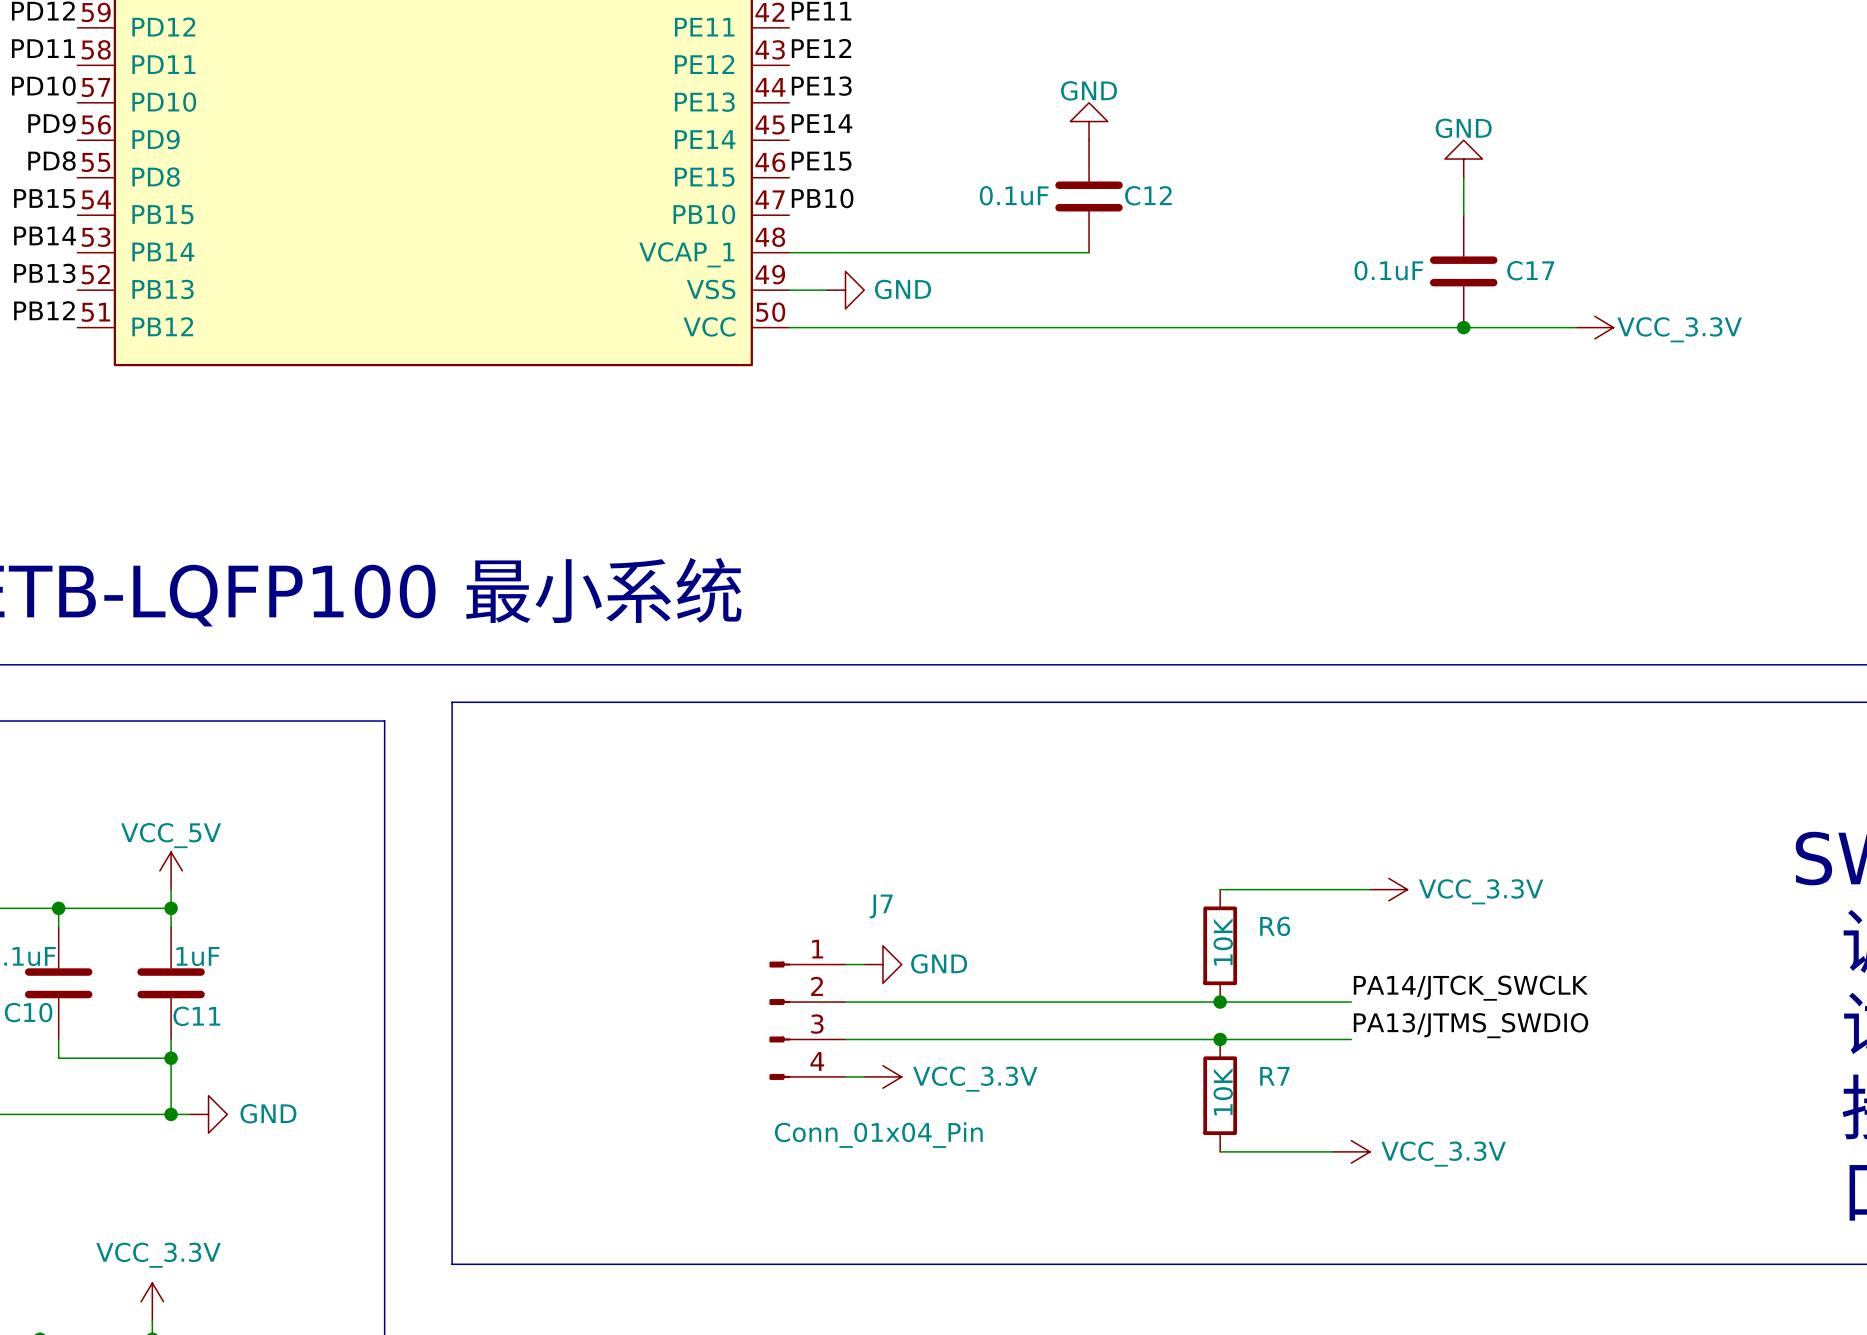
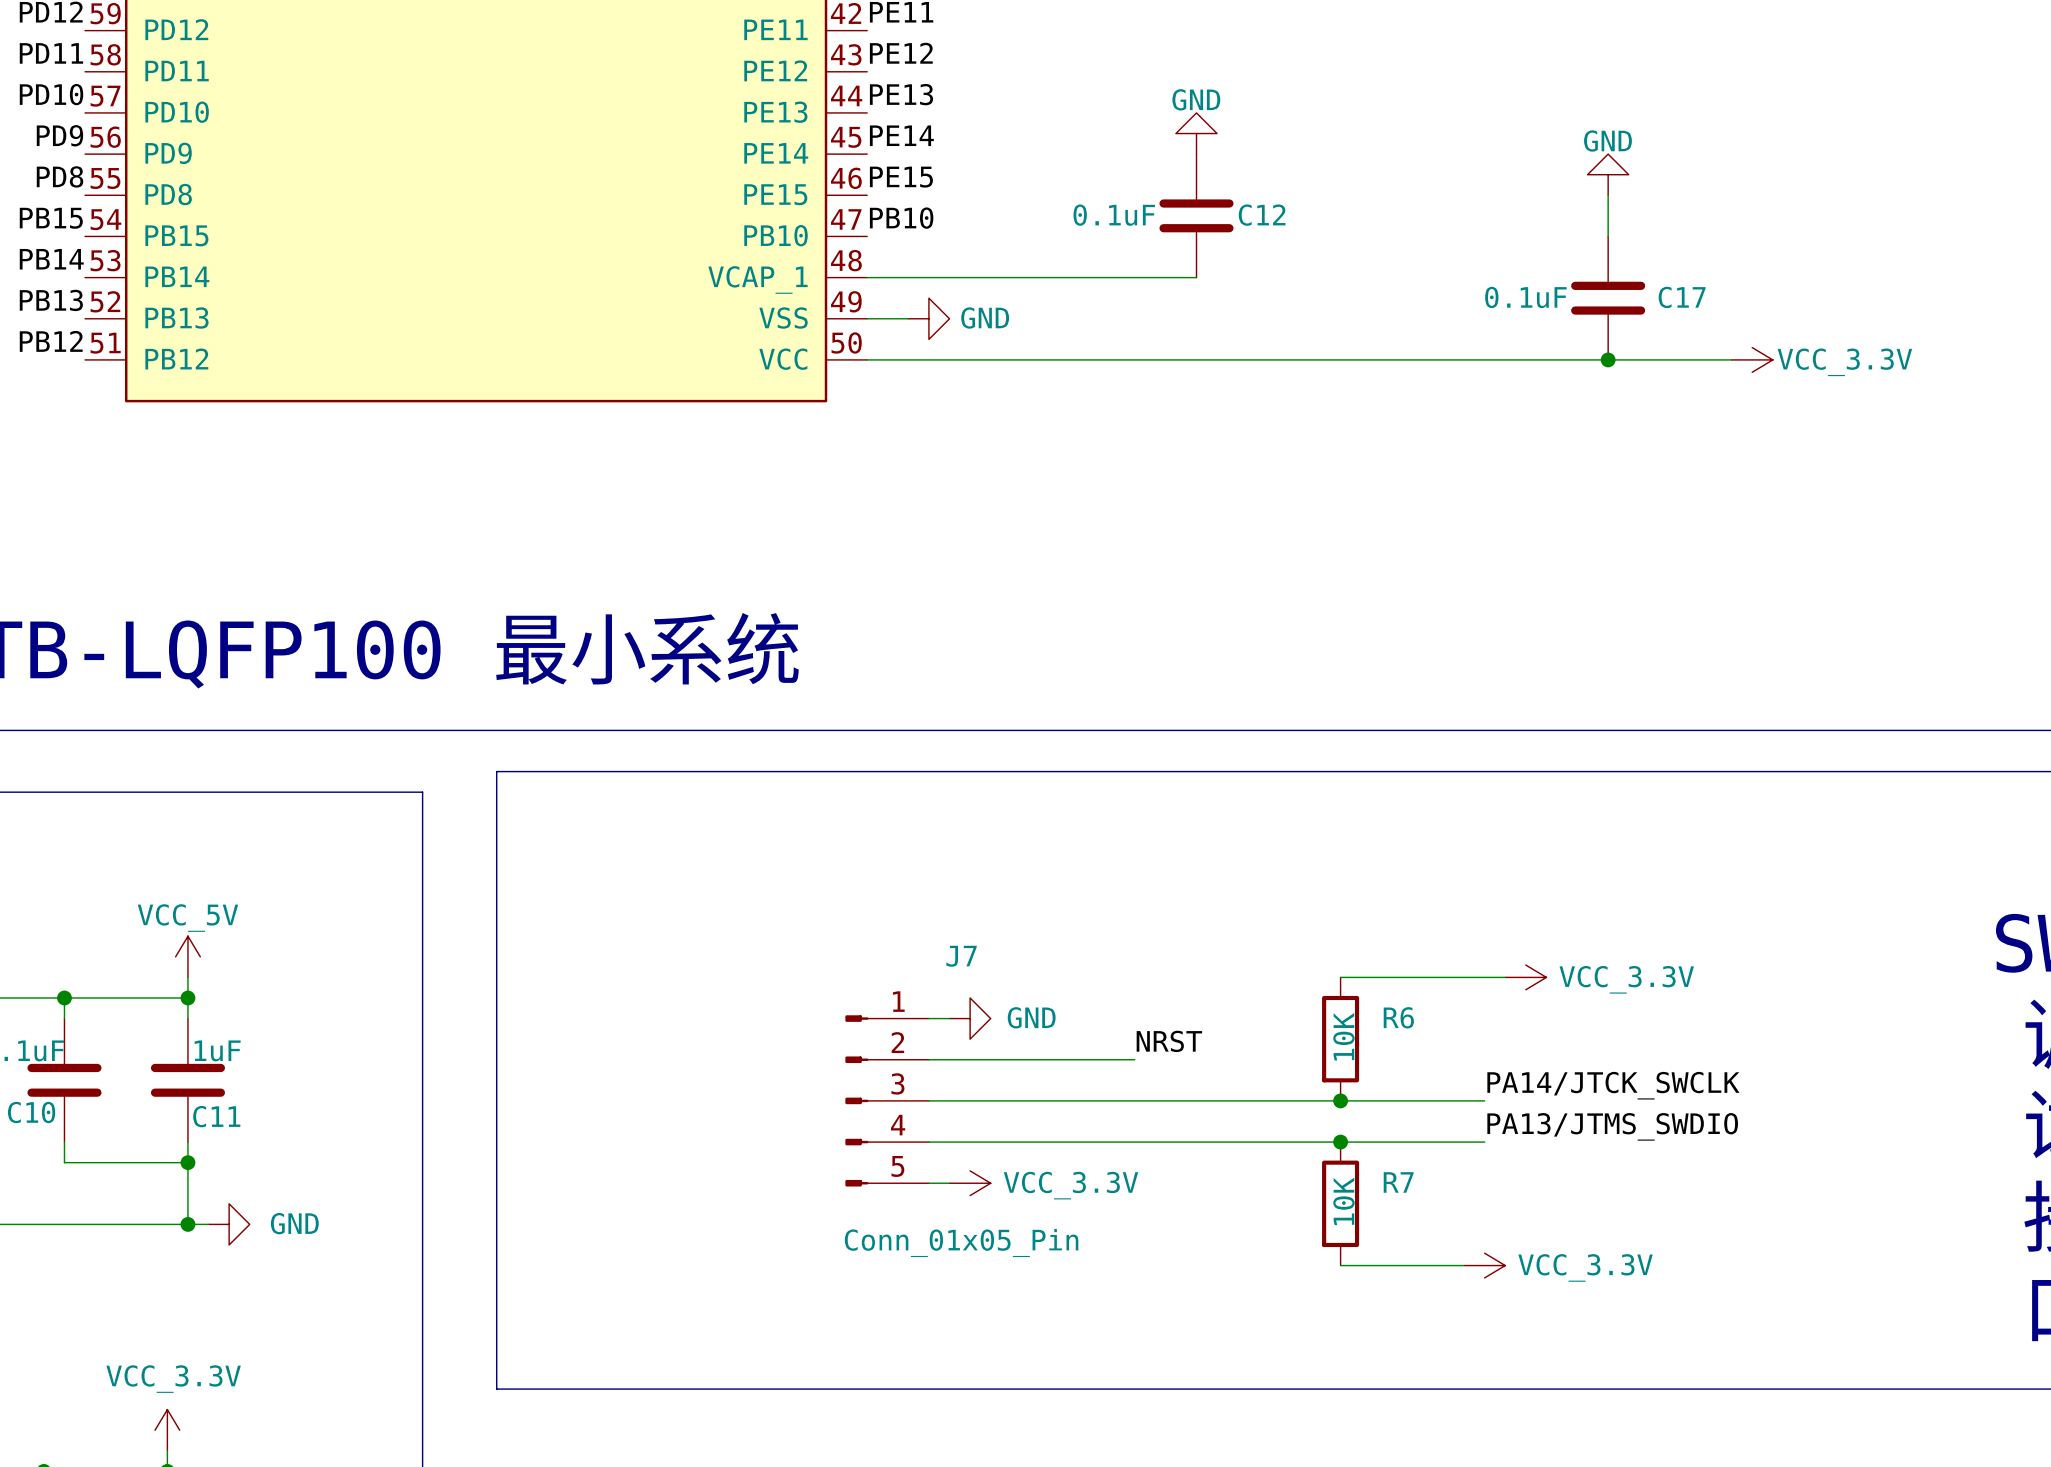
wire: none -> (928, 1018) (949, 1018)
label: none -> NRST (1169, 1041)
J7 symbol: [769, 961, 846, 1080] -> [845, 1015, 929, 1187]
wire: none -> (949, 1059) (1134, 1059)
power symbol position: GND (882, 964) -> GND (970, 1018)
J7 value: Conn_01x04_Pin (878, 1135) -> Conn_01x05_Pin (961, 1242)

